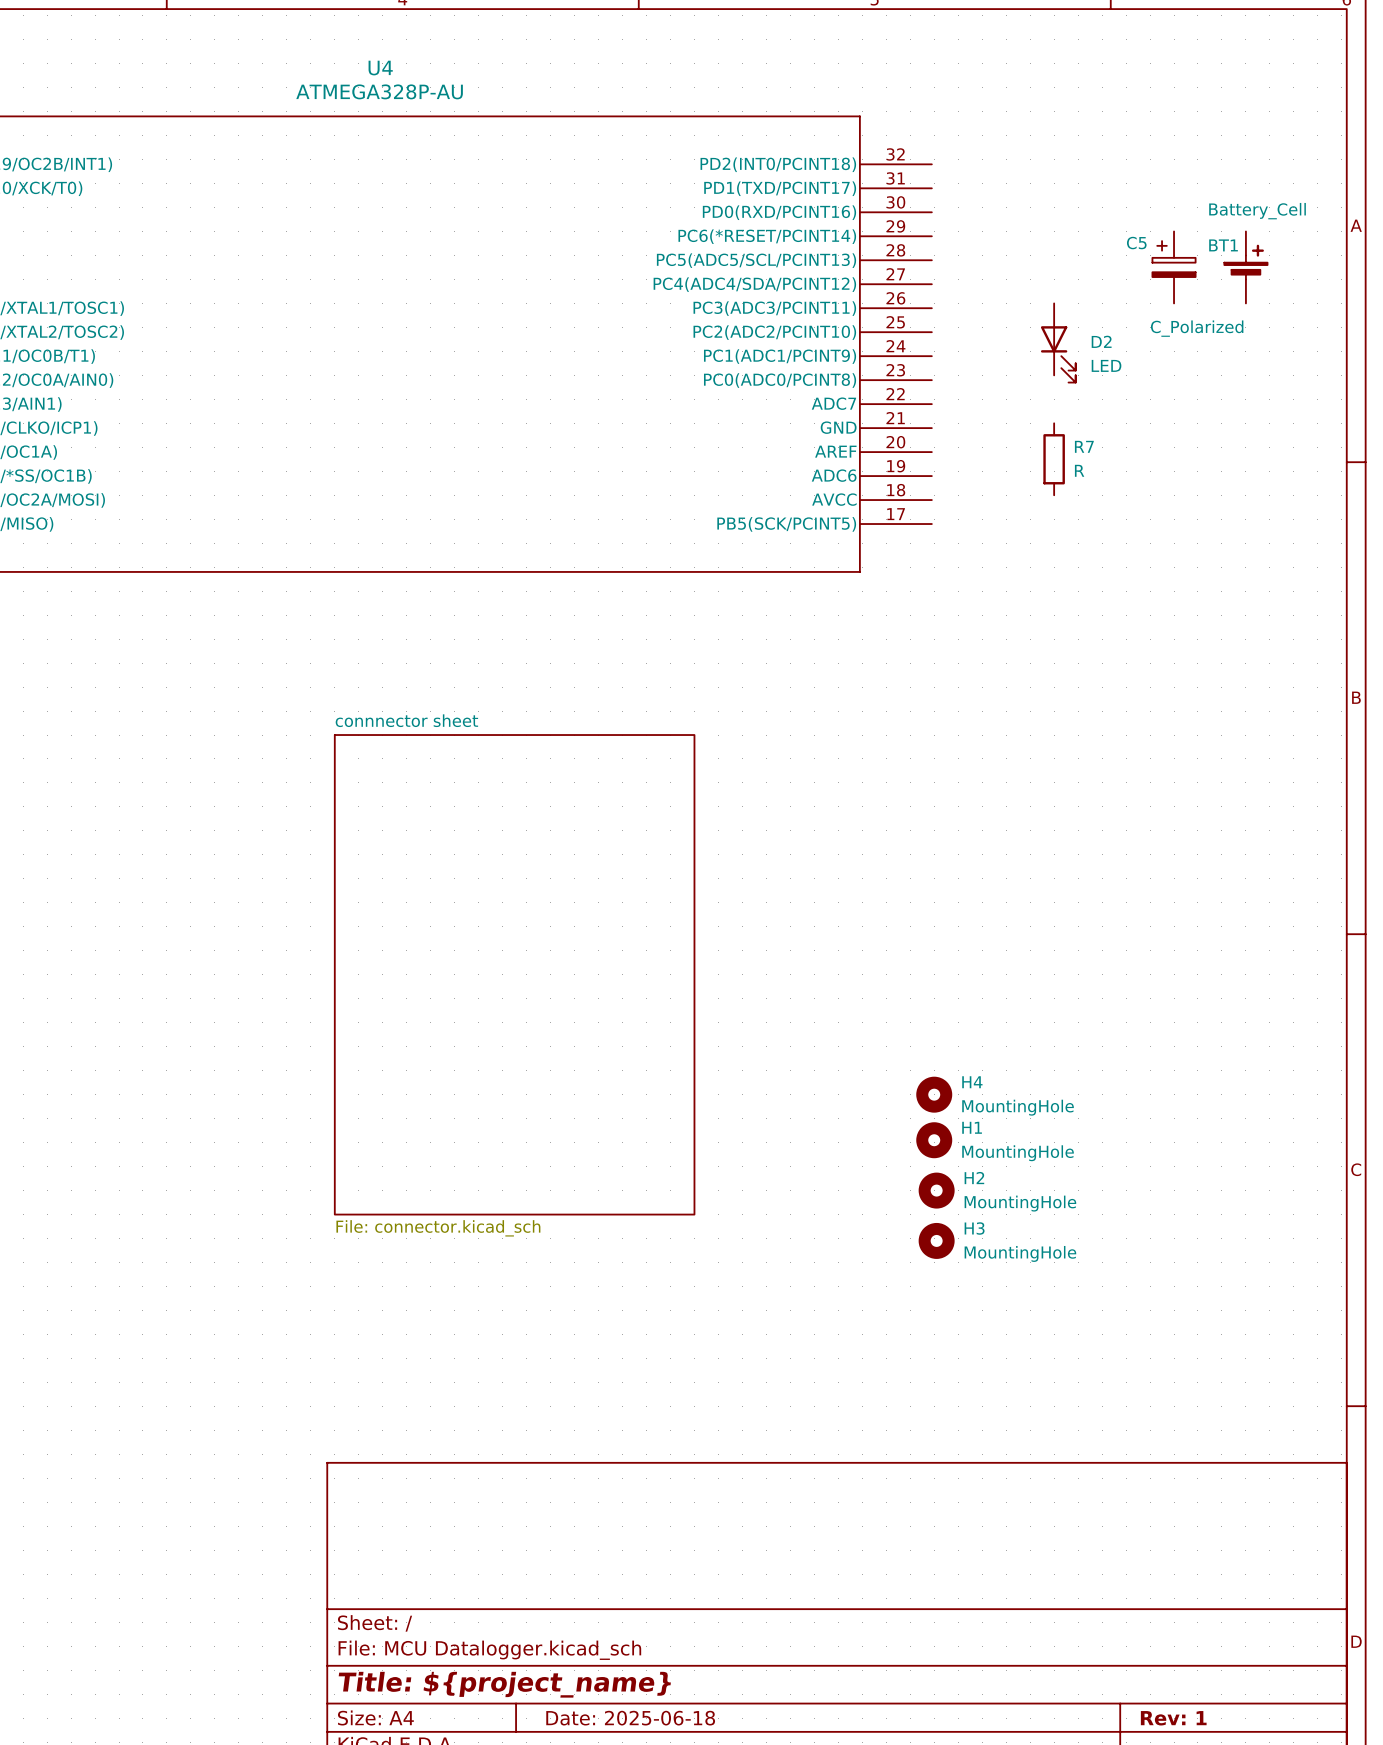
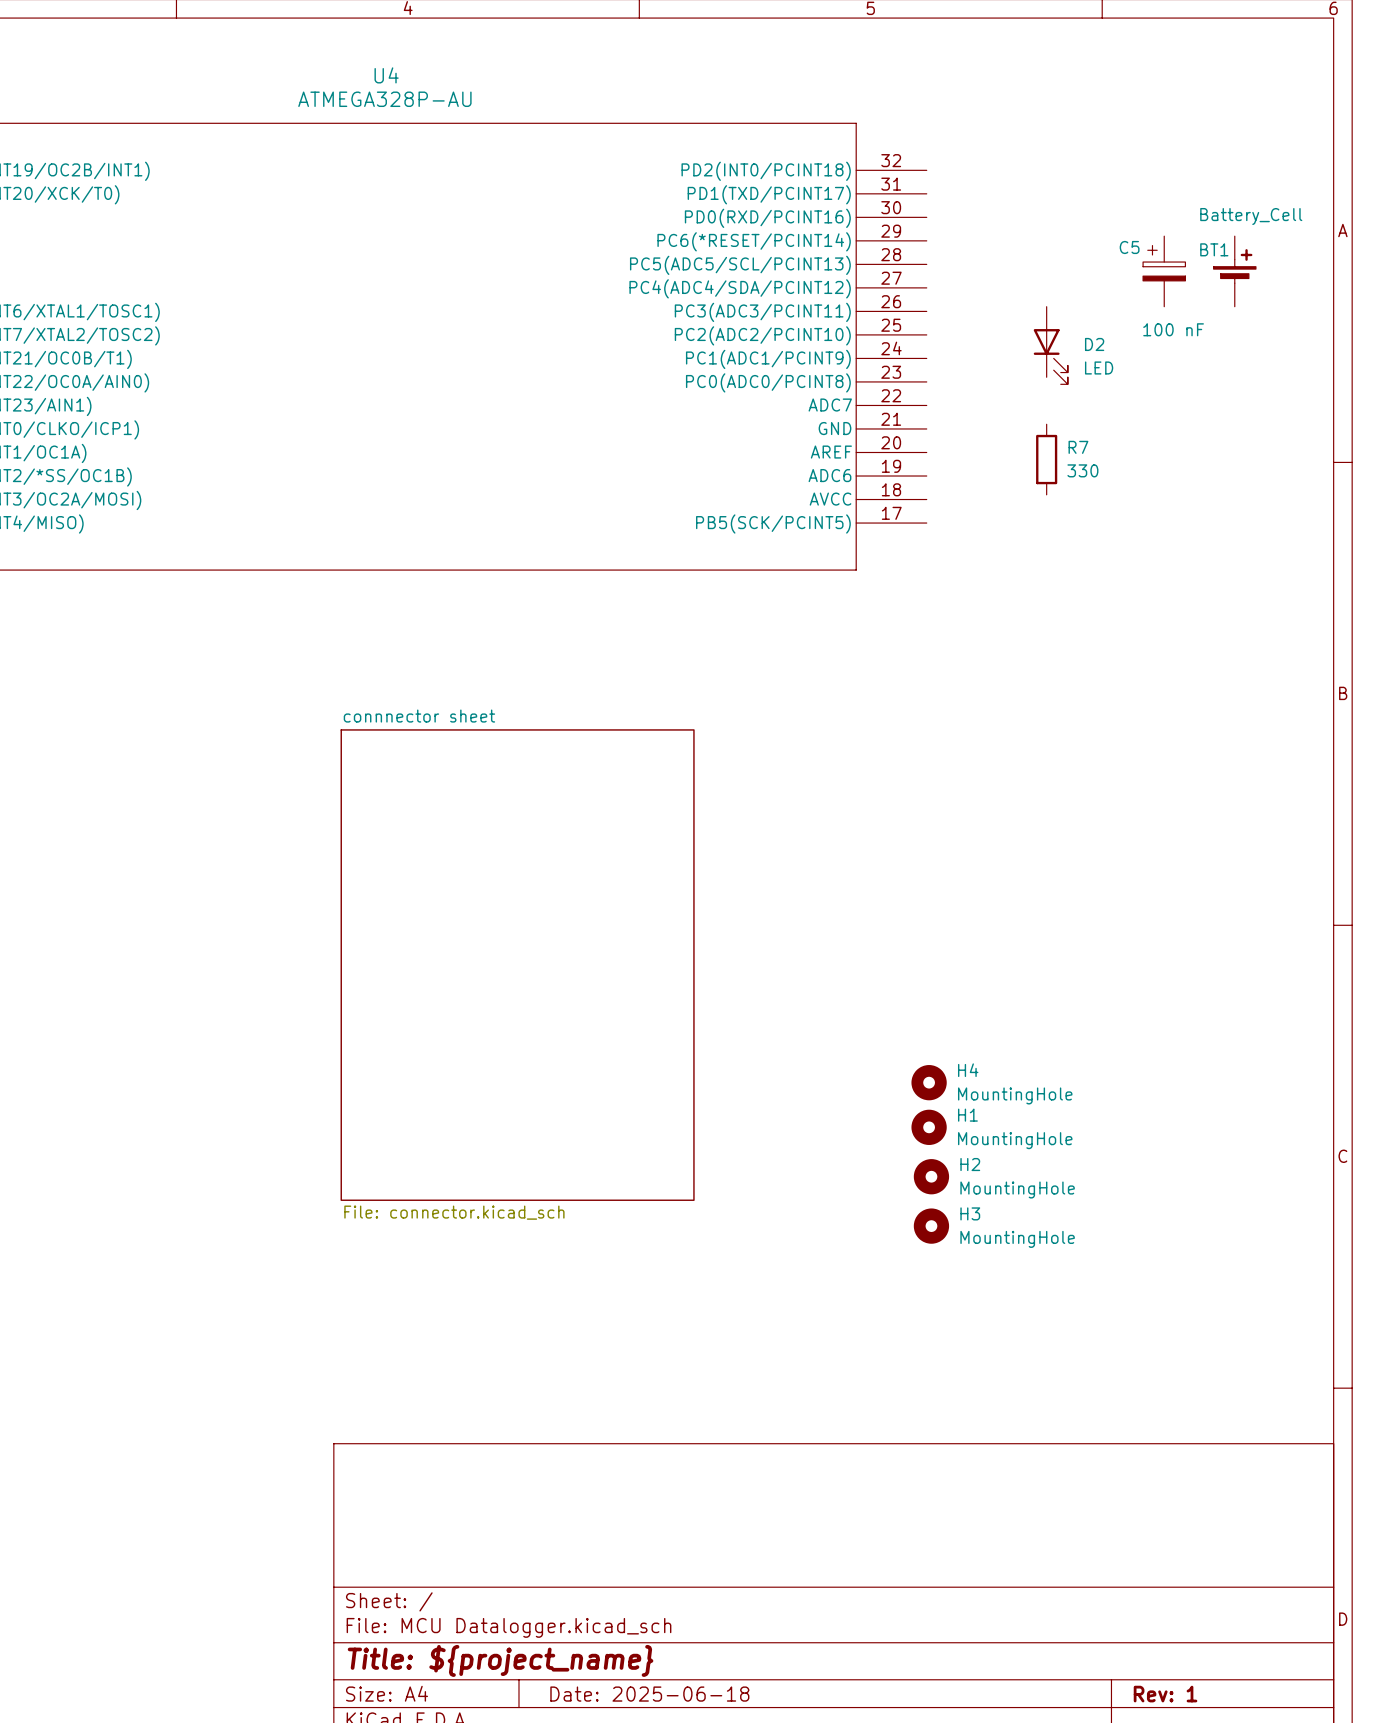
C5 value: C_Polarized (1197, 328) -> 100 nF (1173, 329)
R7 value: R (1079, 470) -> 330 (1082, 470)

